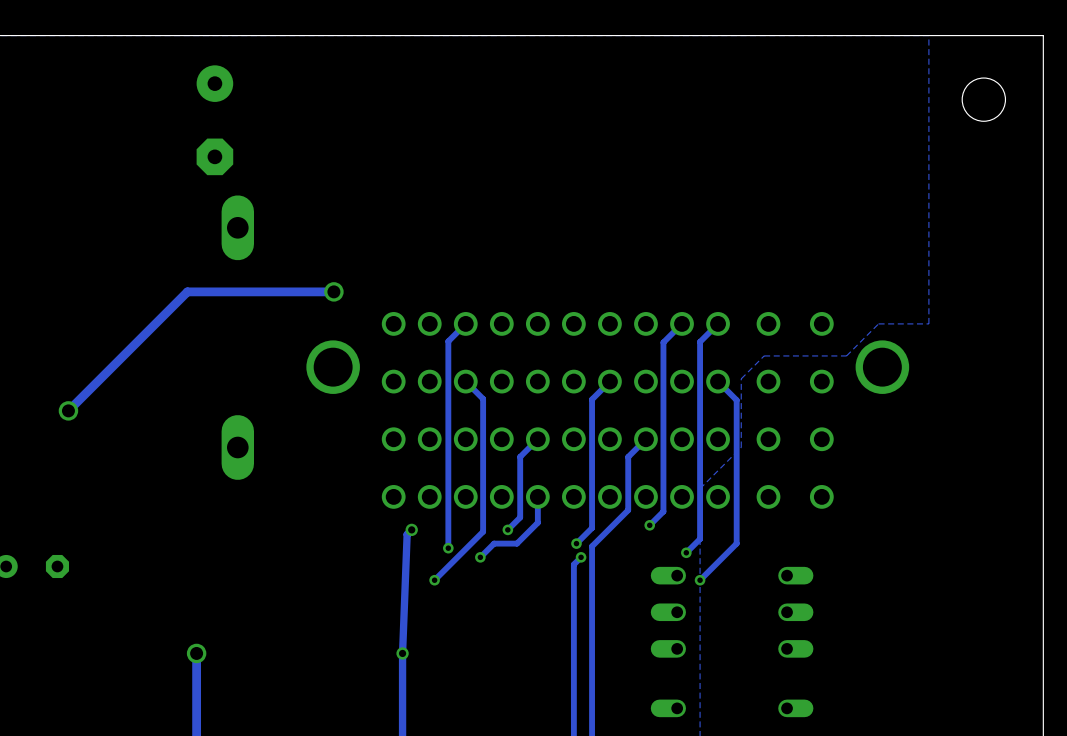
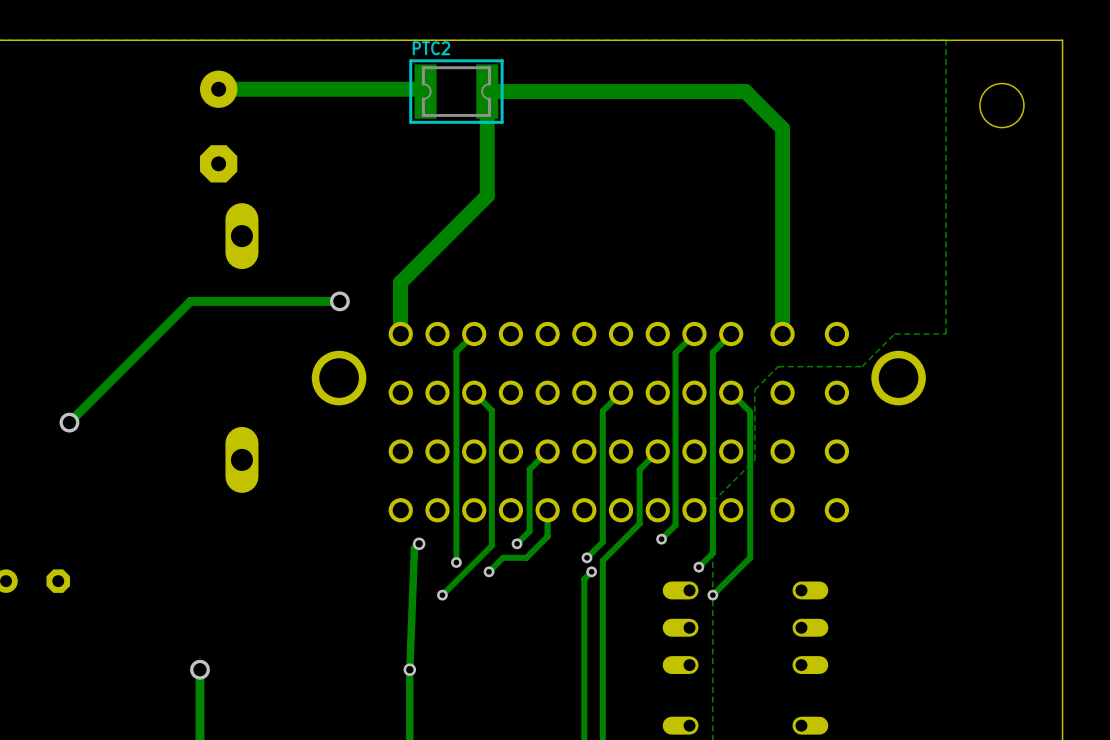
track: none -> (425, 91) (423, 89) (218, 89) (220, 91)
PTC2: none -> (456, 91)
track: none -> (782, 334) (782, 128) (745, 91) (487, 91) (487, 195) (400, 282) (400, 334)

